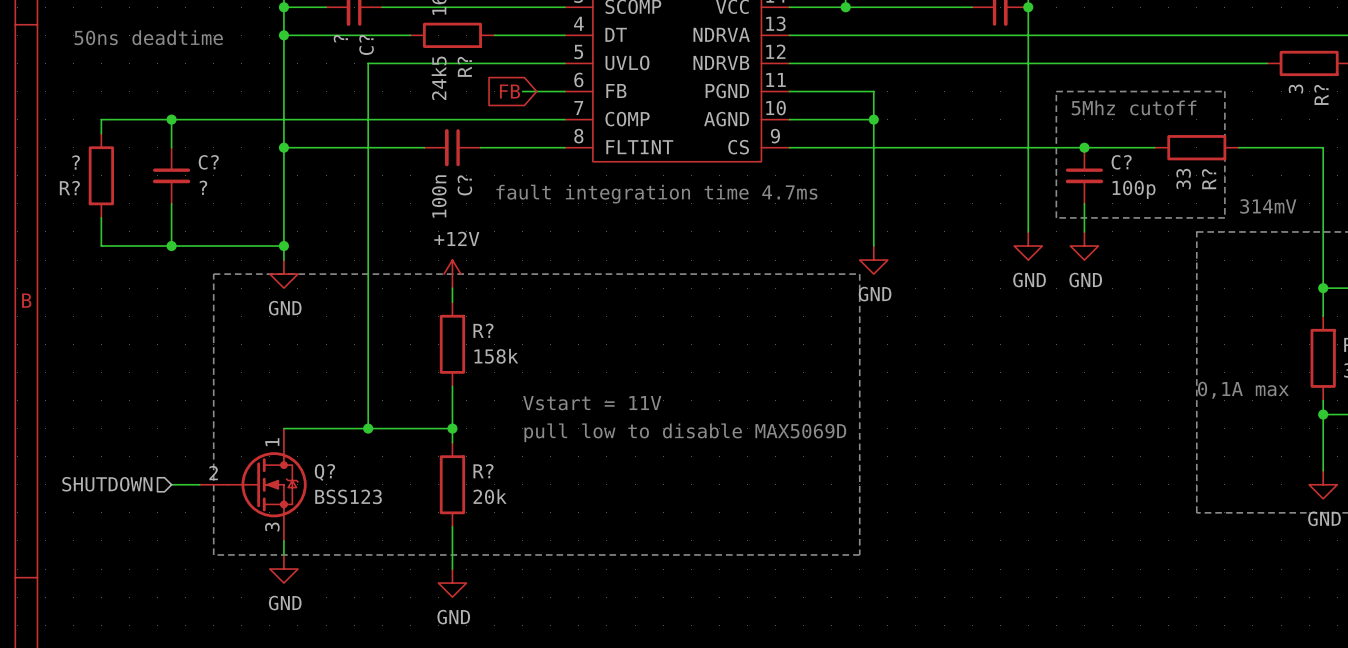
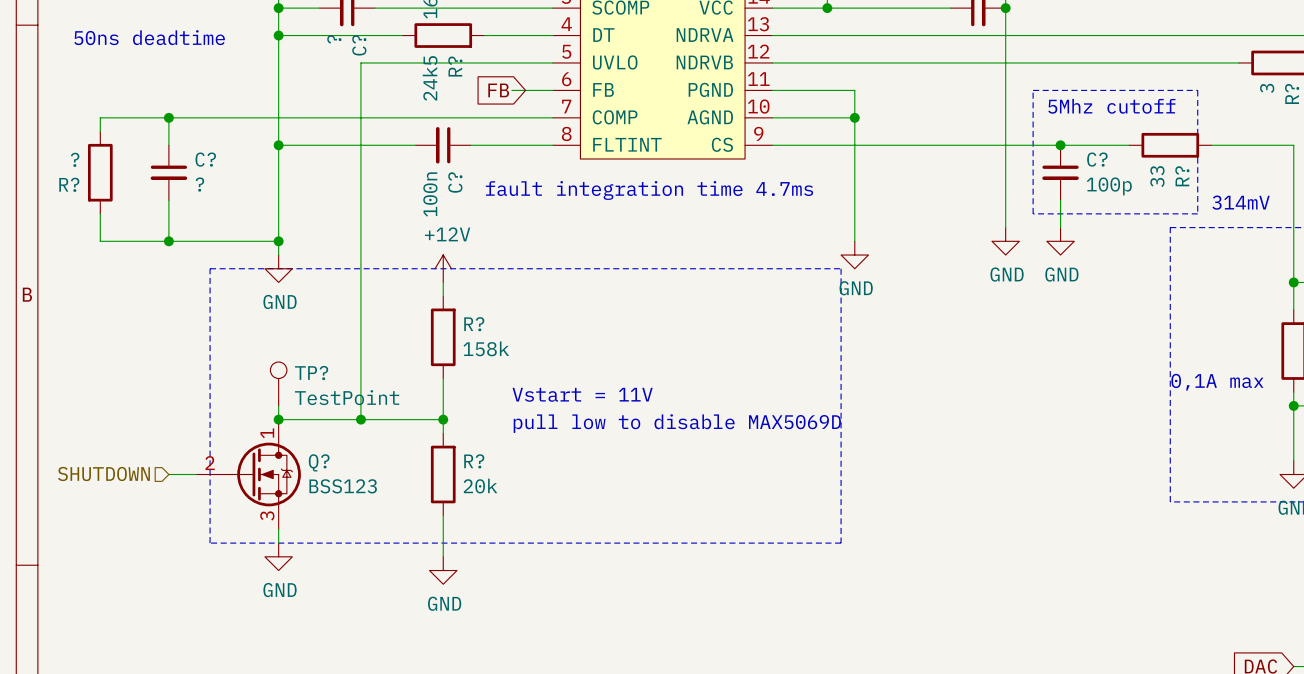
TP?: none -> TestPoint (278, 383)
wire: none -> (278, 405) (278, 419)
junction: none -> (278, 419)

